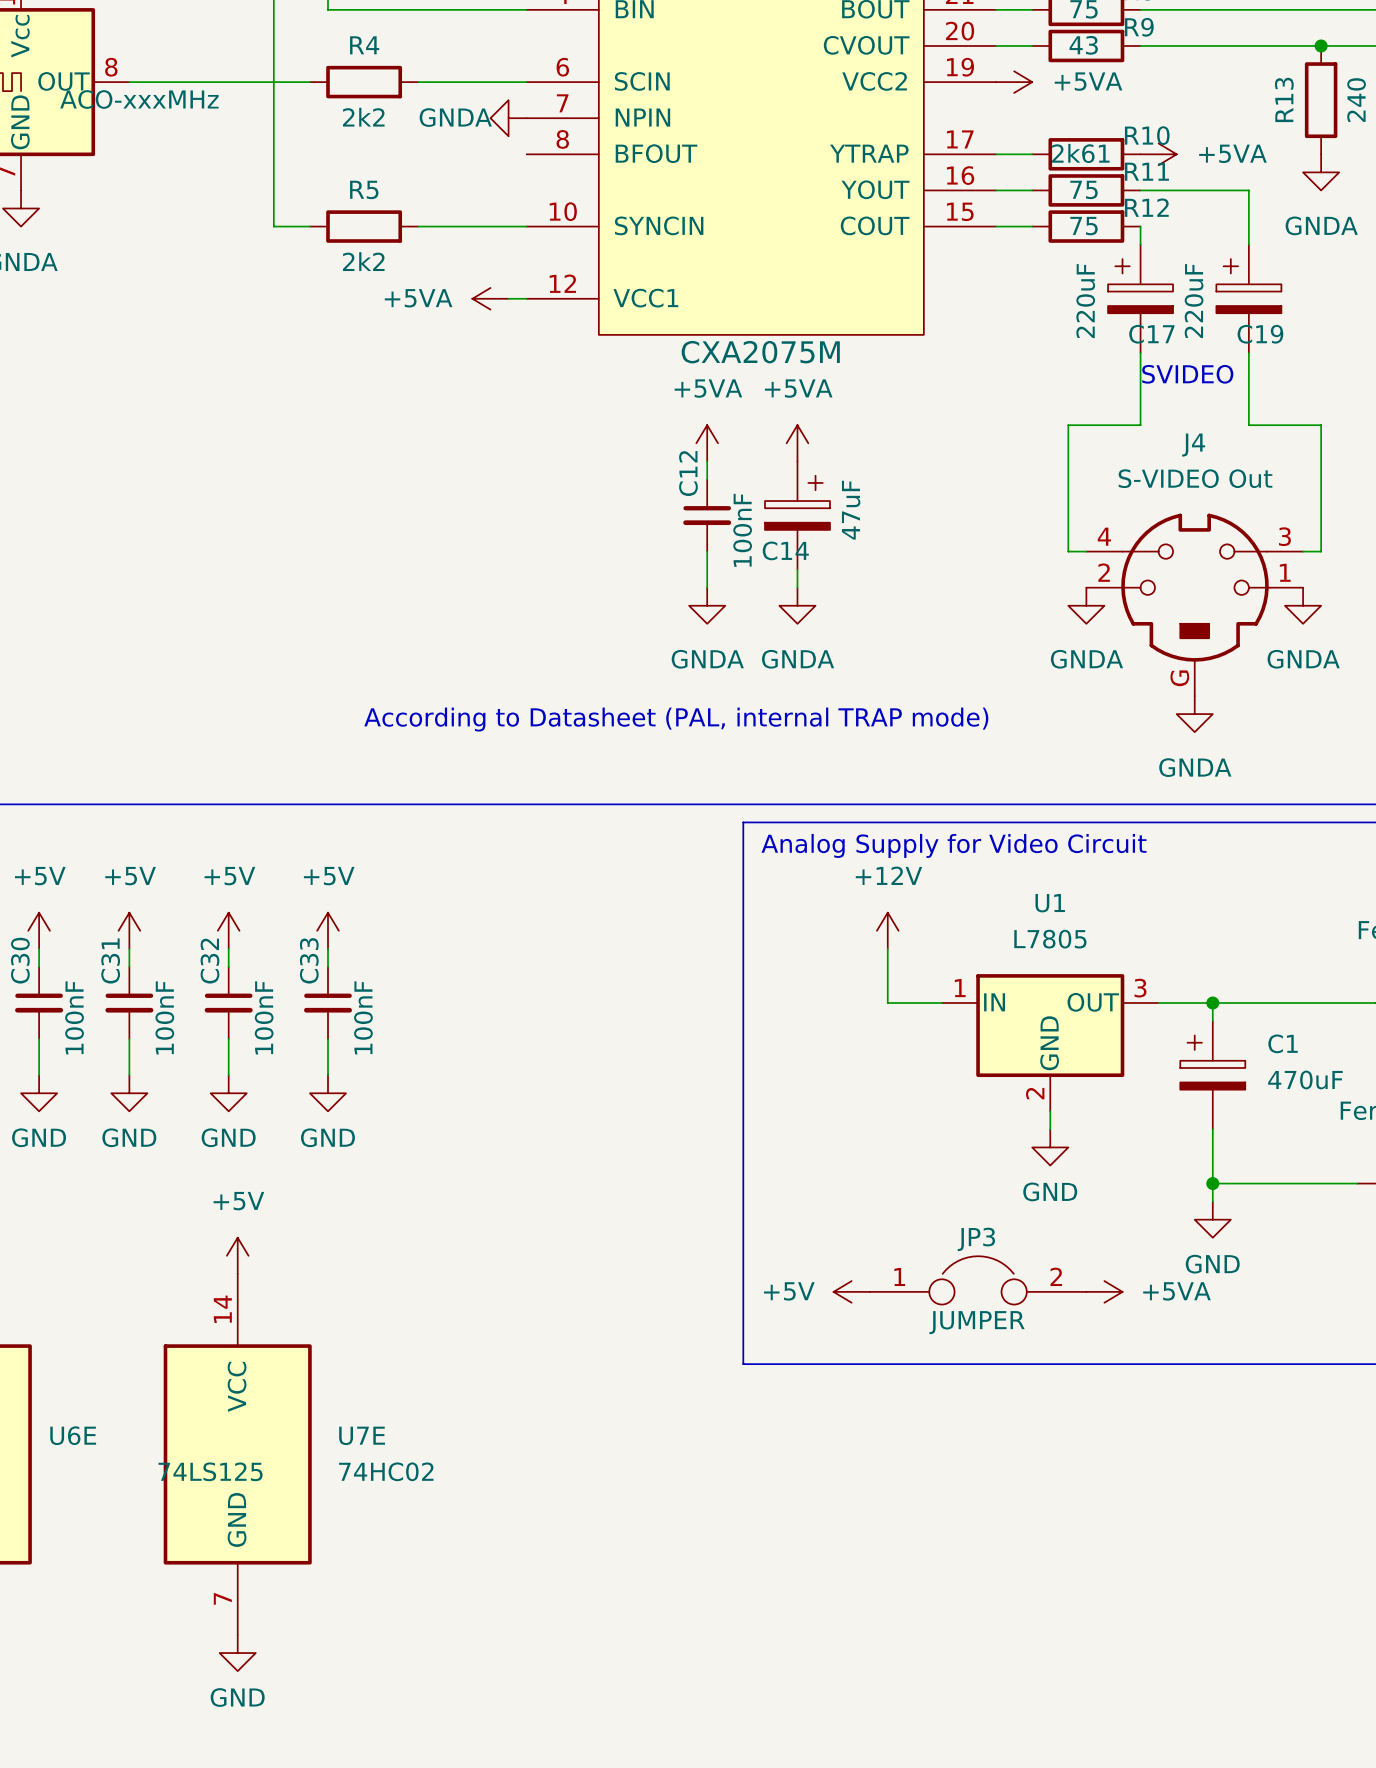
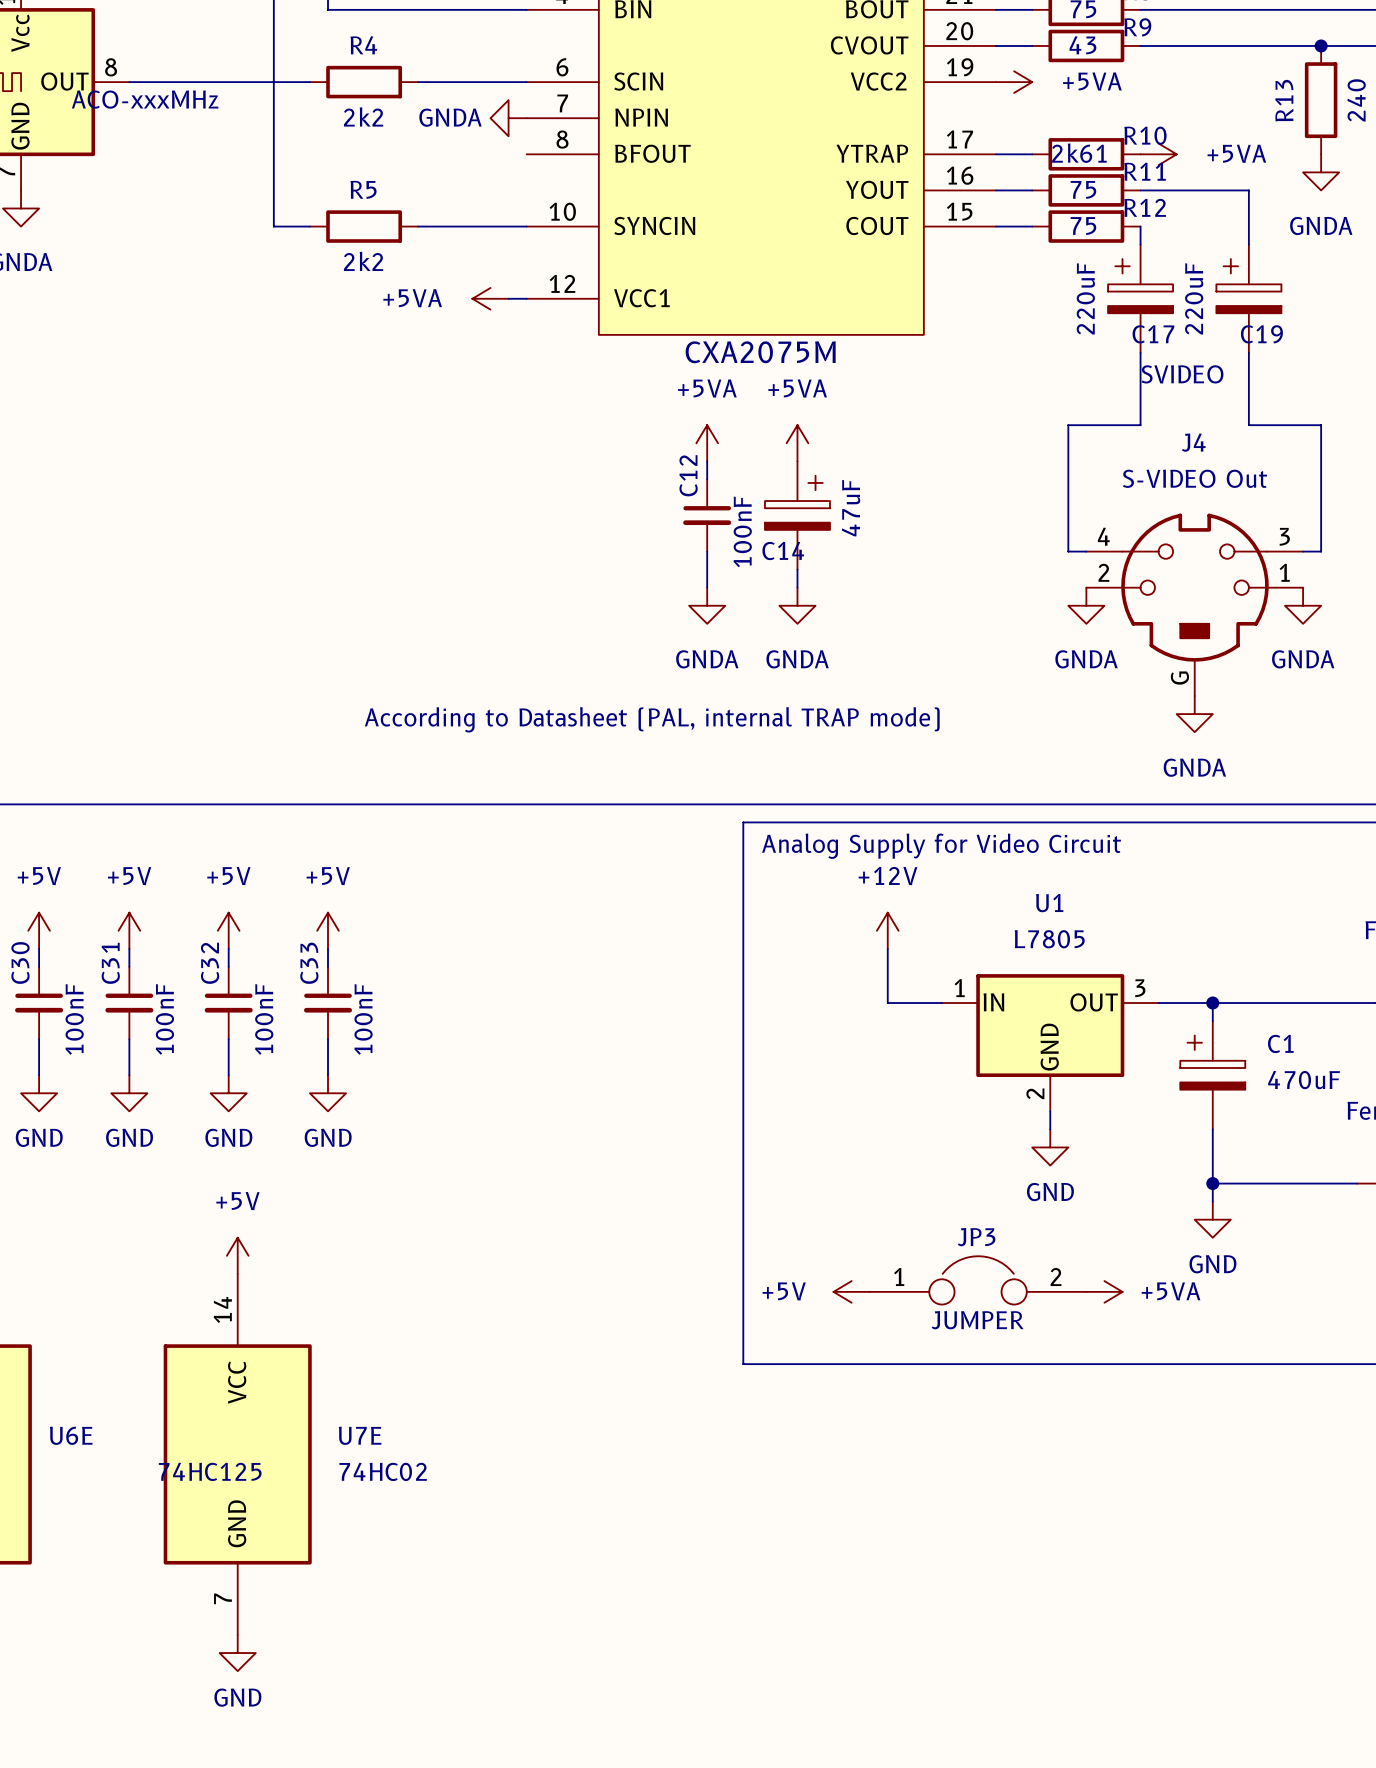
U6E value: 74LS125 (210, 1471) -> 74HC125 (210, 1471)

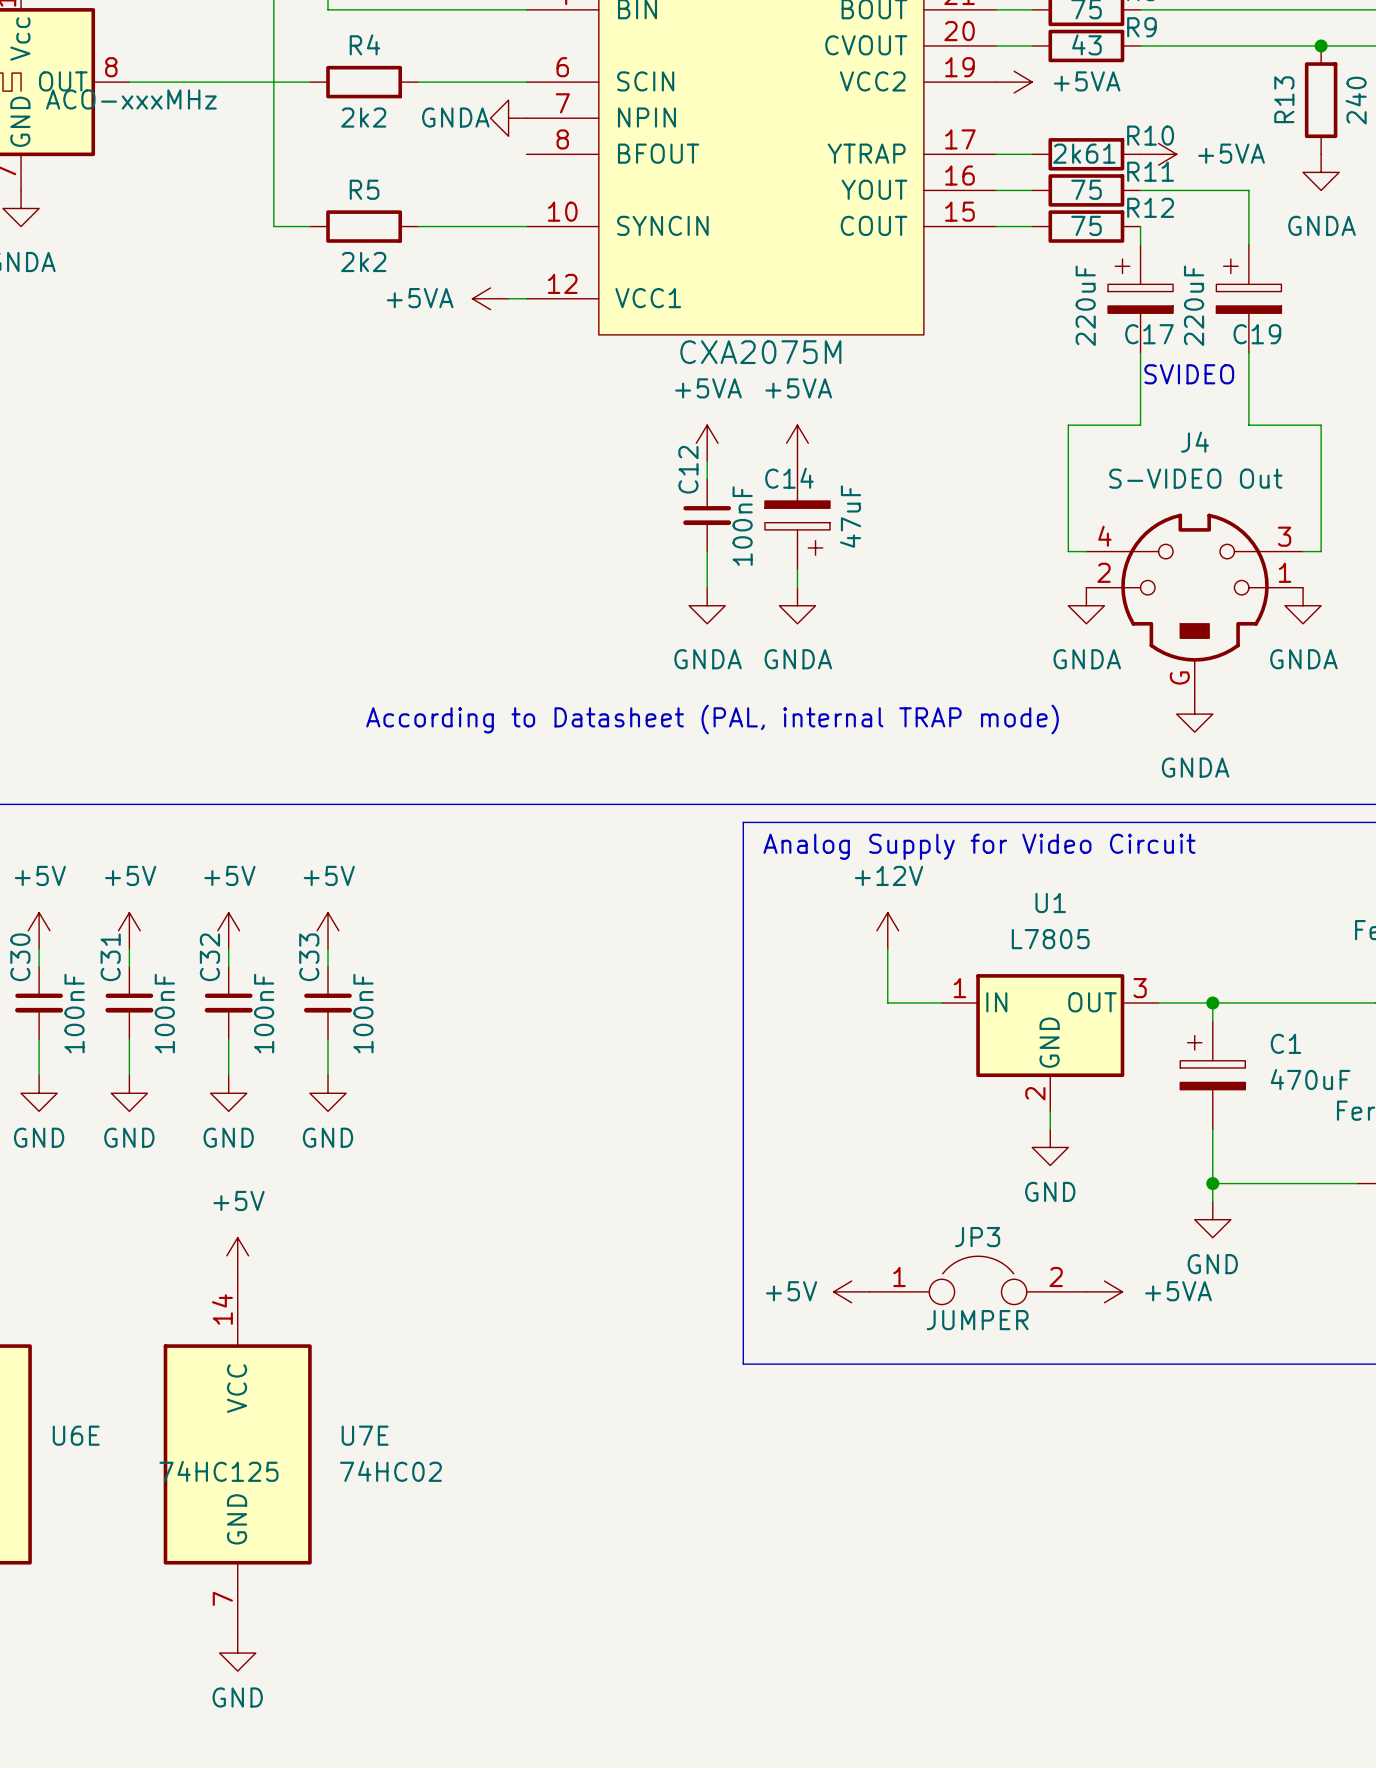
C14 flip: as is (797, 502) -> up-down (797, 528)

